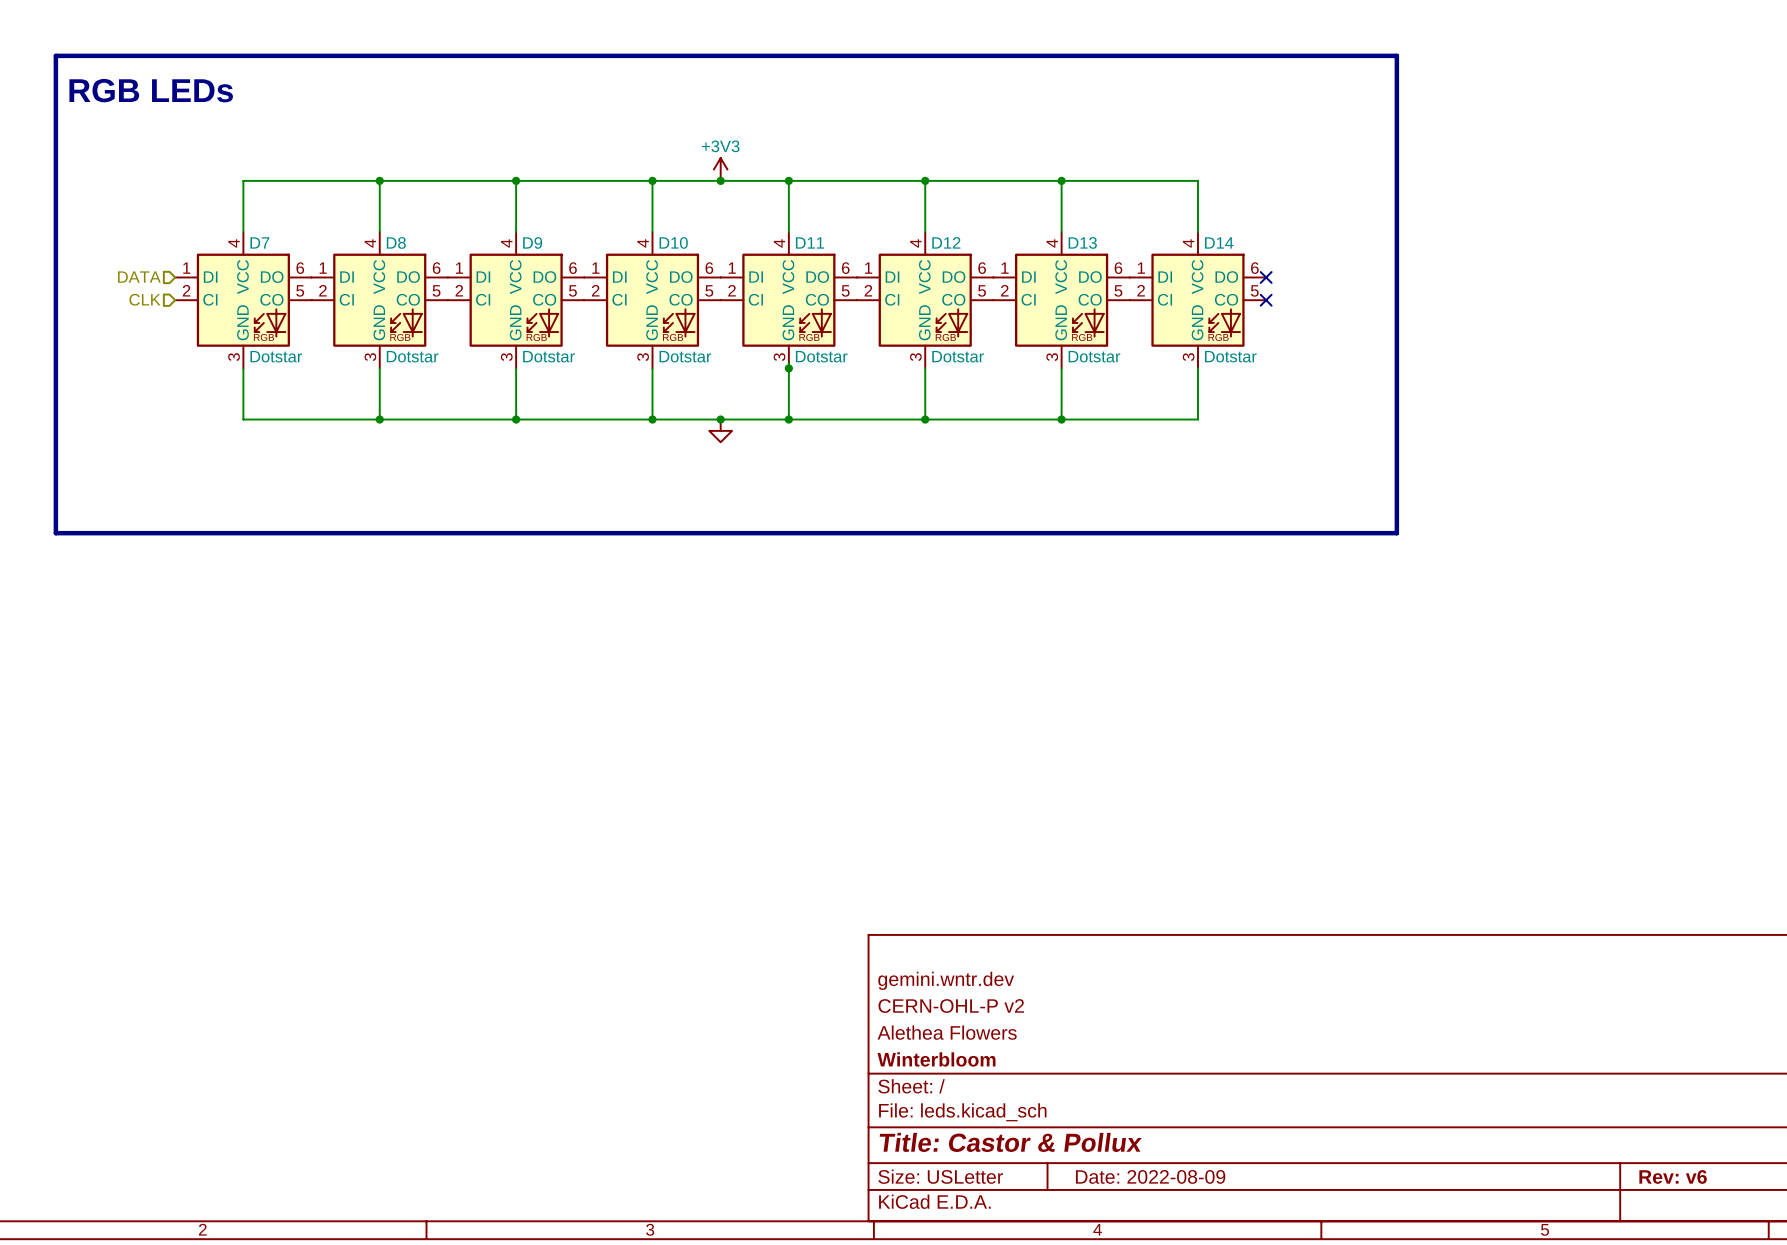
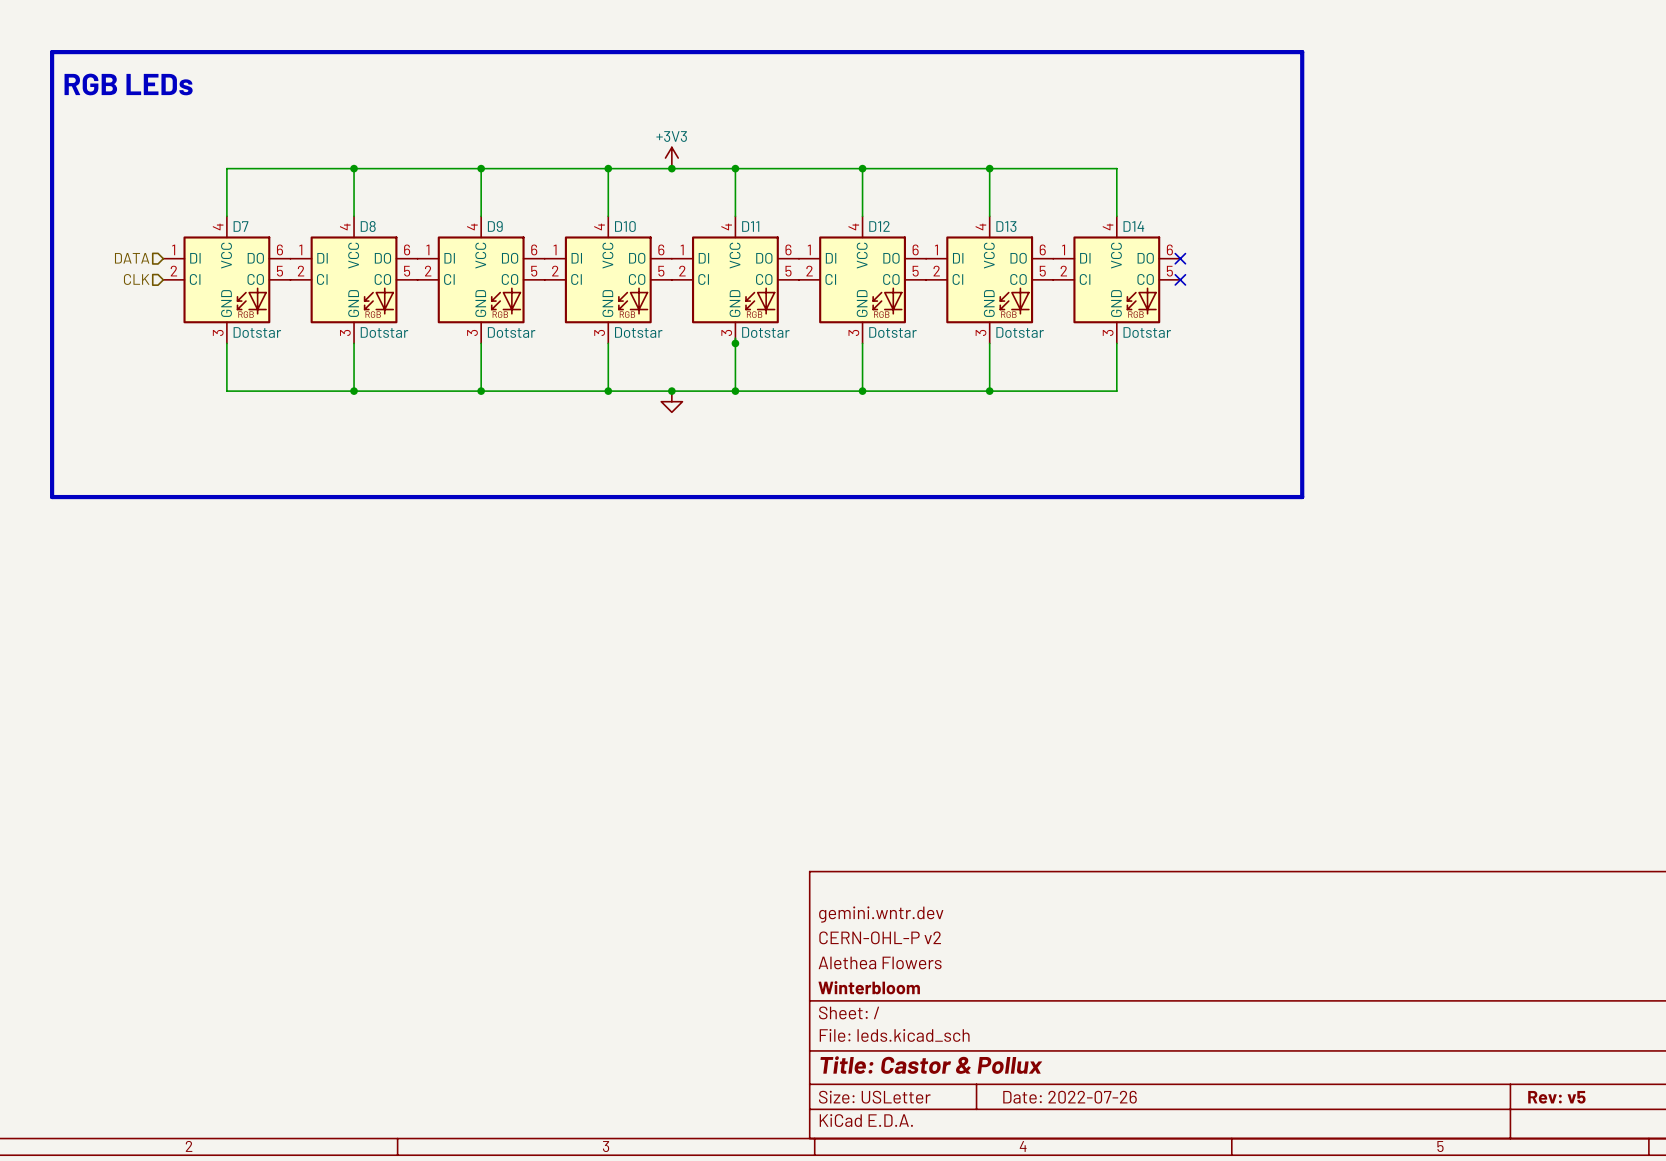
title block: Date: 2022-08-09 (1150, 1176) -> Date: 2022-07-26 (1070, 1097)
title block: Rev: v6 (1673, 1176) -> Rev: v5 (1556, 1097)

